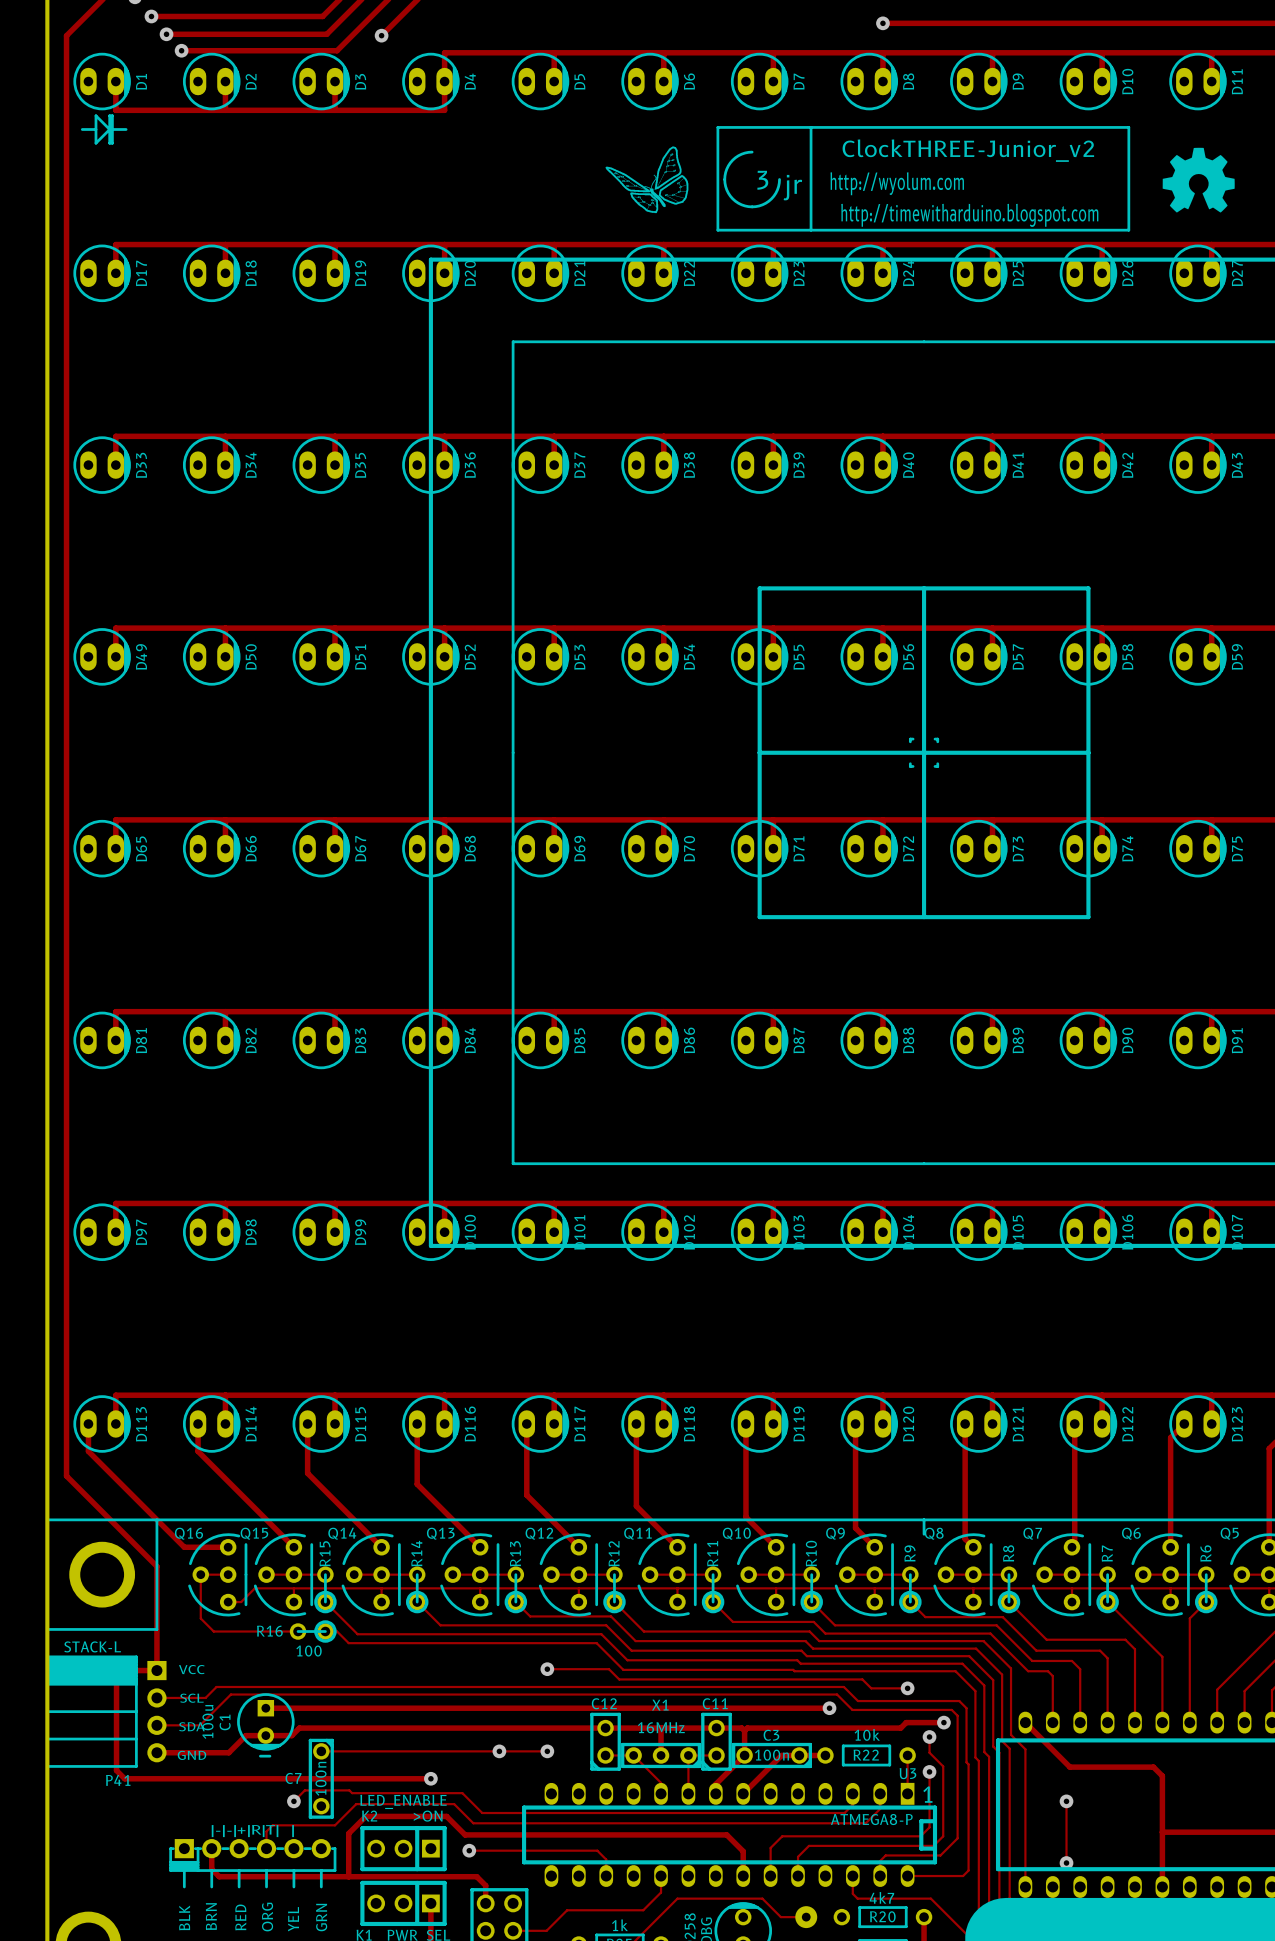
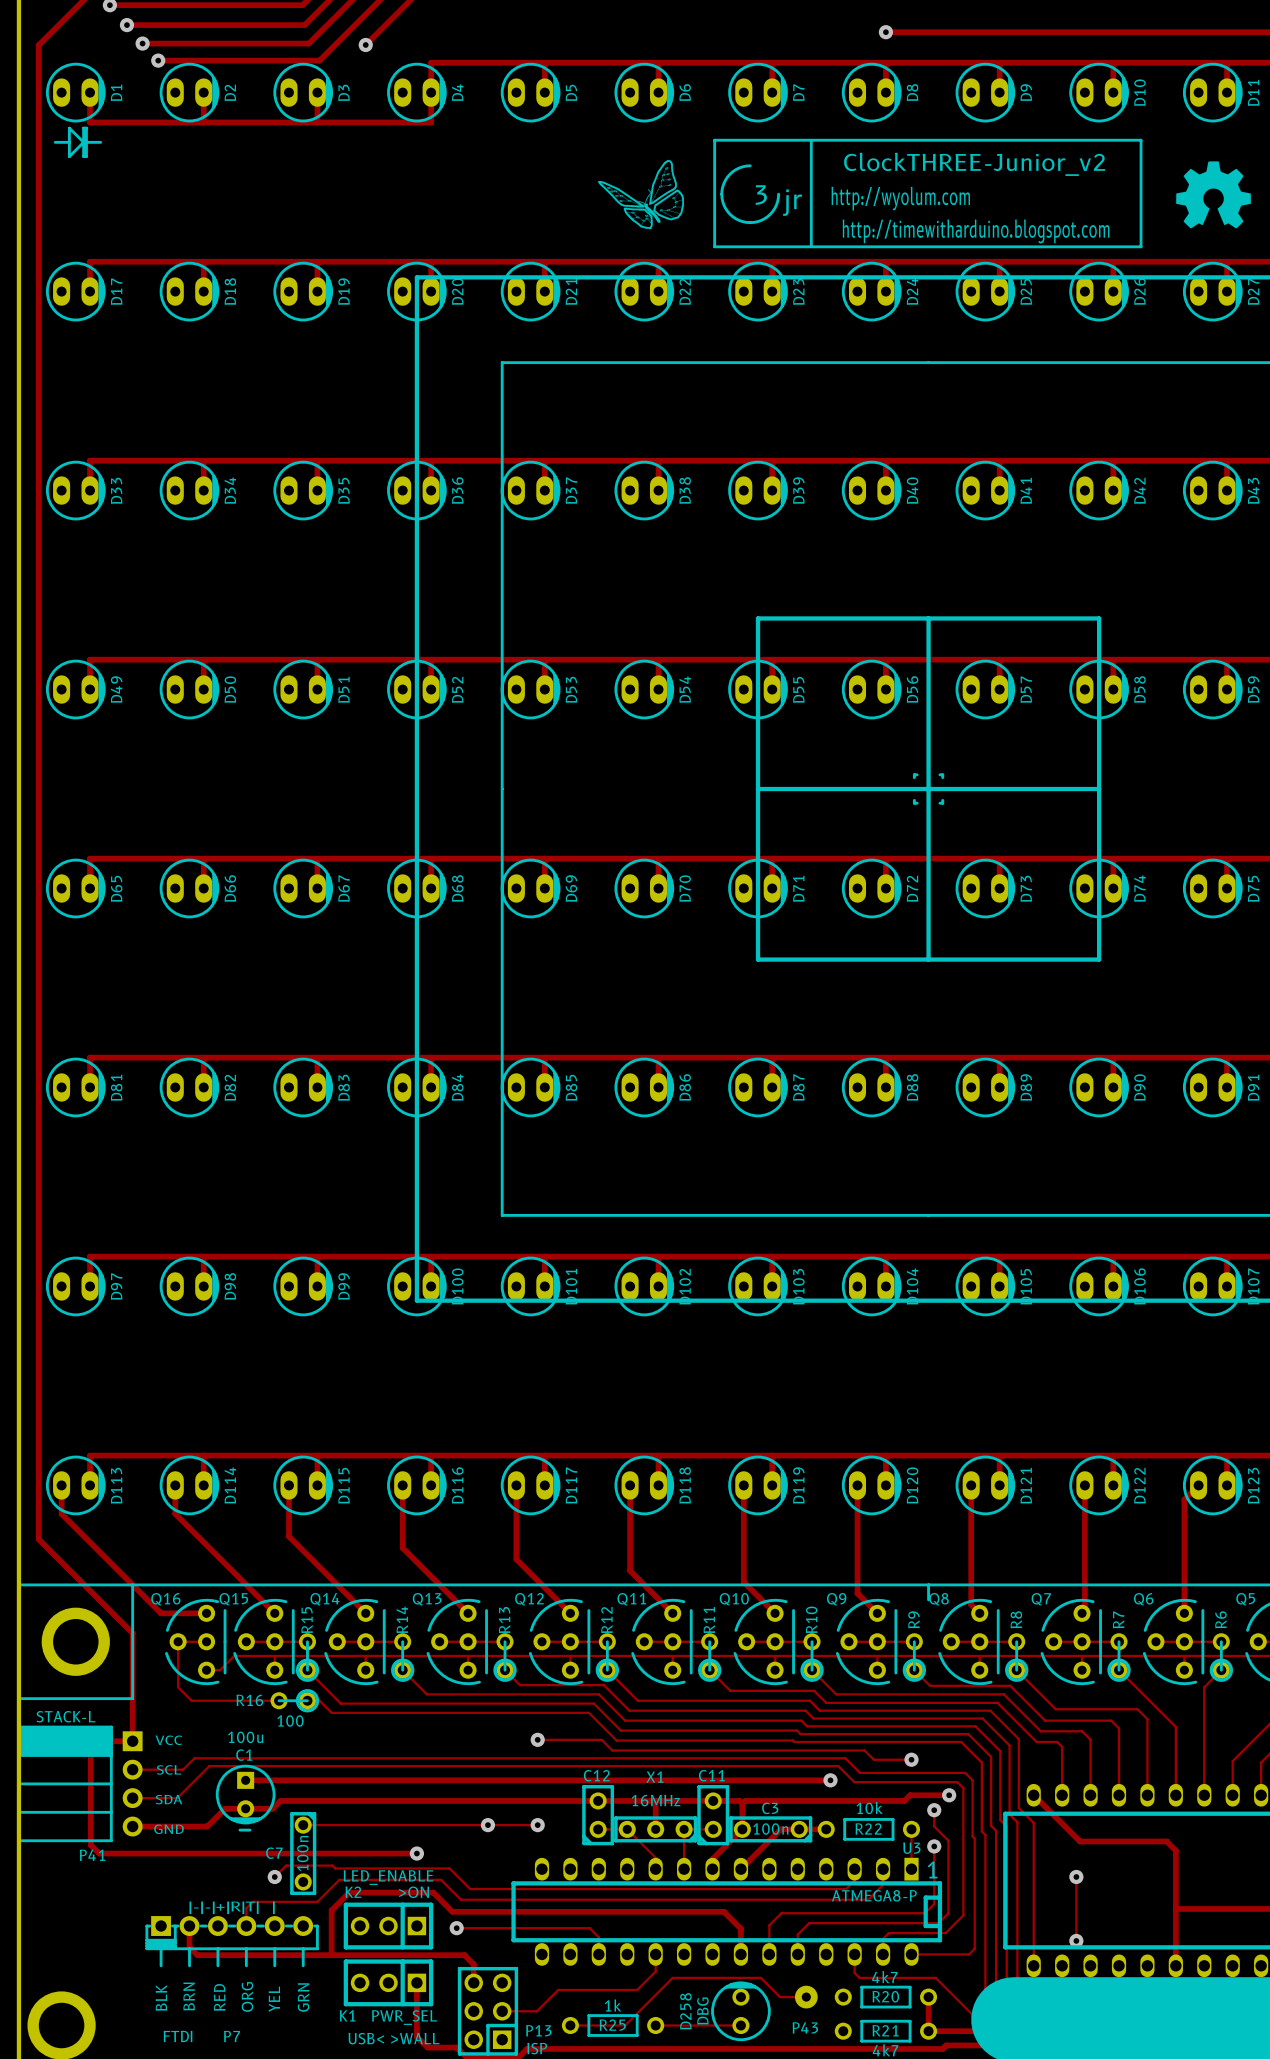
C1 value rotation: 0° (207, 1721) -> 90° clockwise (245, 1737)
C1 value position: 100u (207, 1721) -> 100u (245, 1737)
C1 name rotation: 0° (225, 1722) -> 90° clockwise (244, 1755)
C1 name position: C1 (225, 1722) -> C1 (244, 1755)

